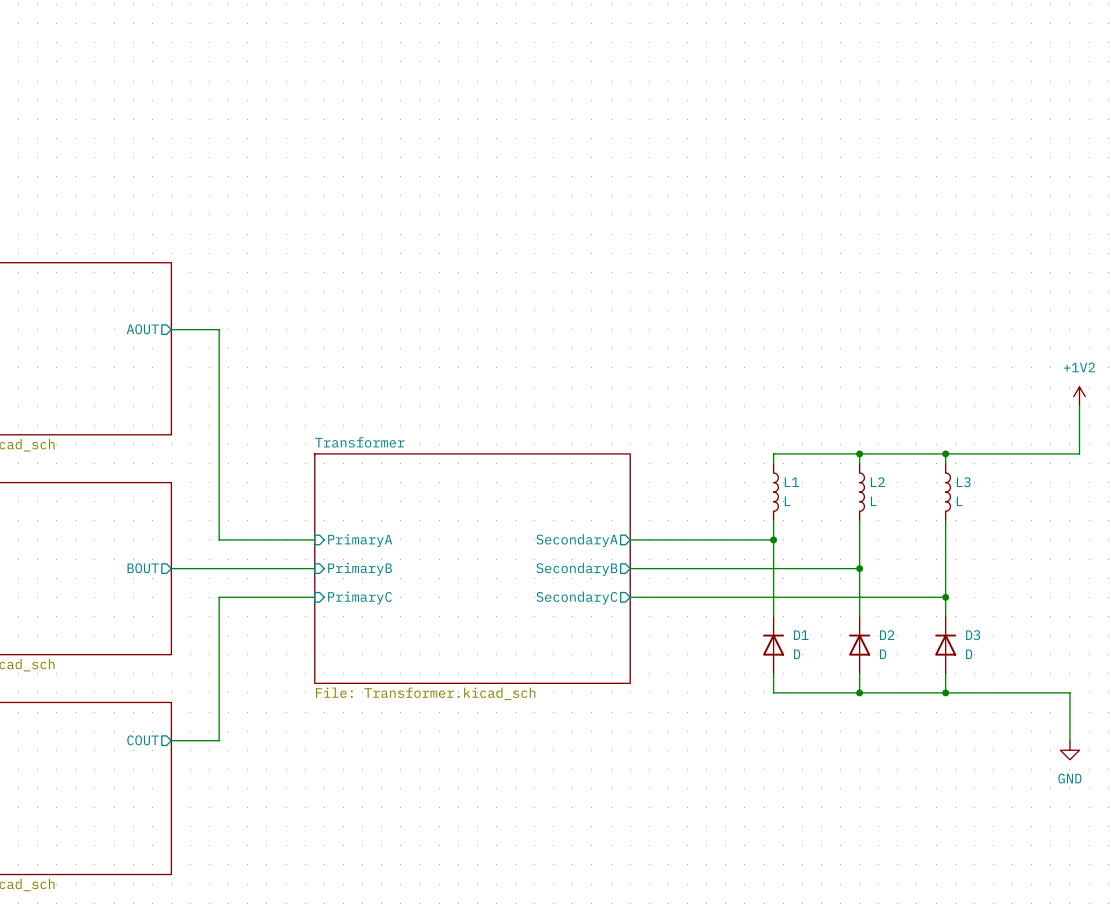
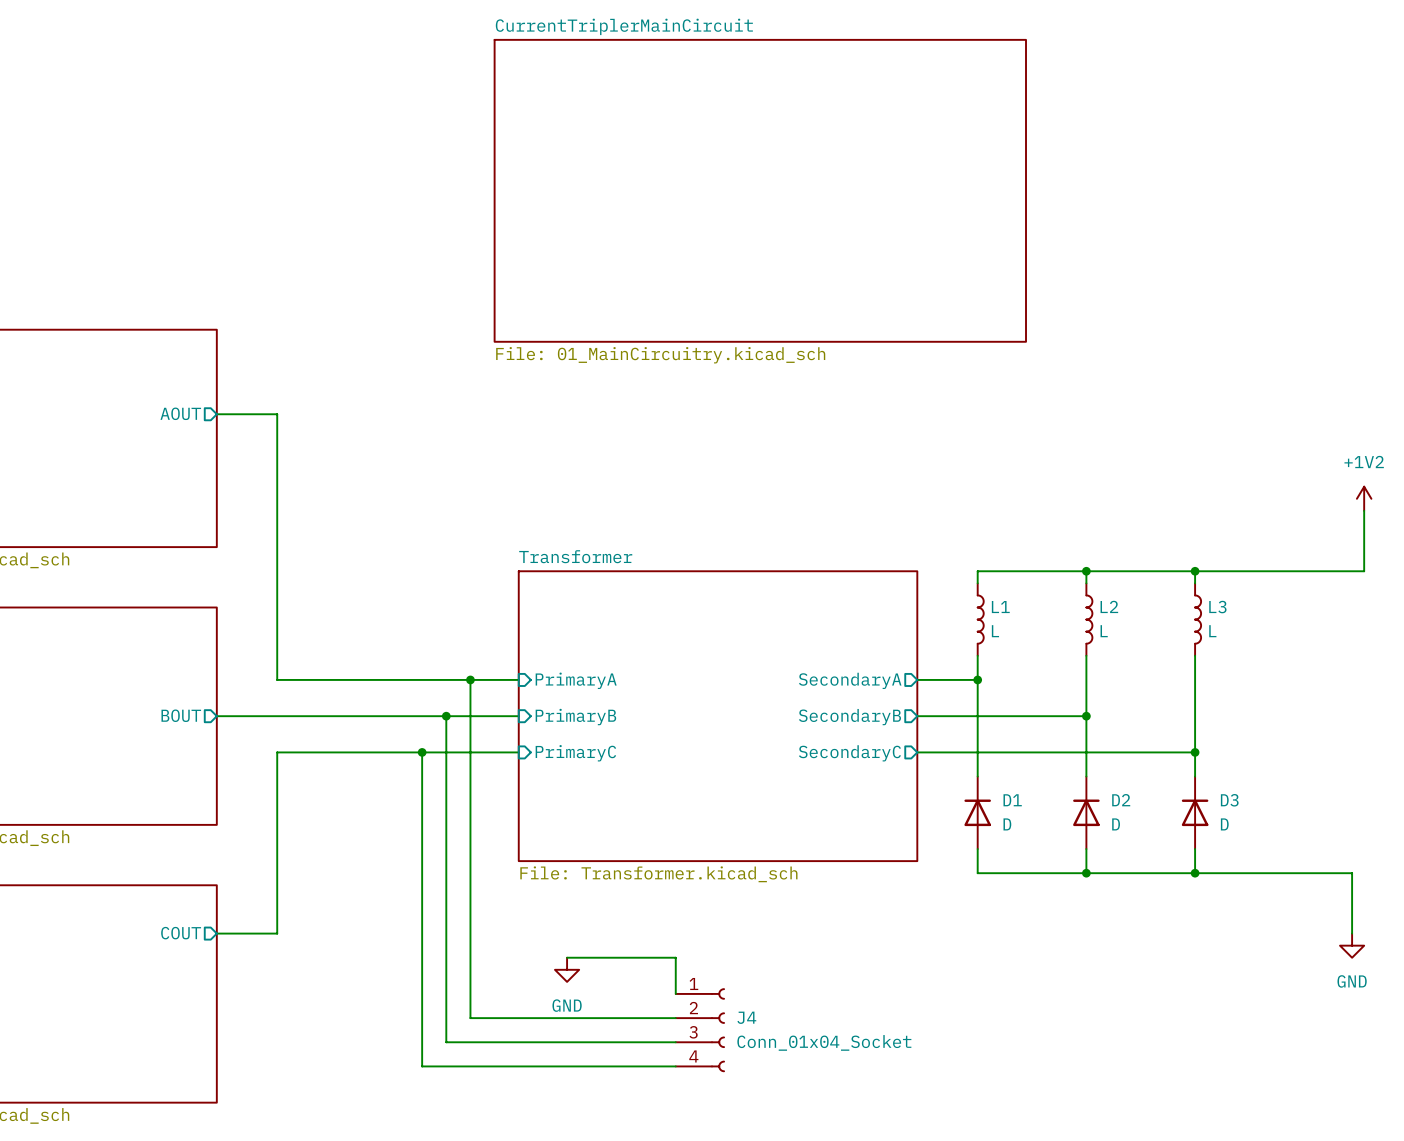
sheet CurrentTriplerMainCircuit: none -> File: 01_MainCircuitry.kicad_sch (760, 190)
wire: none -> (397, 679) (518, 679)
wire: none -> (470, 679) (470, 1018) (675, 1018)
junction: none -> (470, 679)
wire: (630, 539) (725, 539) -> none
sheet pin position: PrimaryA (360, 540) -> PrimaryA (576, 680)
sheet pin position: SecondaryA (577, 540) -> SecondaryA (850, 680)
wire: none -> (397, 716) (518, 716)
wire: none -> (446, 716) (446, 1042) (675, 1042)
junction: none -> (446, 716)
sheet Transformer position: (472, 568) -> (718, 716)
wire: (630, 568) (725, 568) -> none
sheet pin position: PrimaryB (360, 569) -> PrimaryB (575, 717)
sheet pin position: SecondaryB (576, 569) -> SecondaryB (849, 717)
wire: none -> (397, 752) (518, 752)
wire: none -> (422, 752) (422, 1066) (675, 1066)
junction: none -> (422, 752)
sheet pin position: PrimaryC (359, 597) -> PrimaryC (575, 753)
wire: (630, 597) (725, 597) -> none
sheet pin position: SecondaryC (576, 598) -> SecondaryC (849, 753)
wire: none -> (567, 957) (675, 957) (675, 993)
power symbol: none -> GND (567, 969)
J4: none -> Conn_01x04_Socket (700, 1030)

